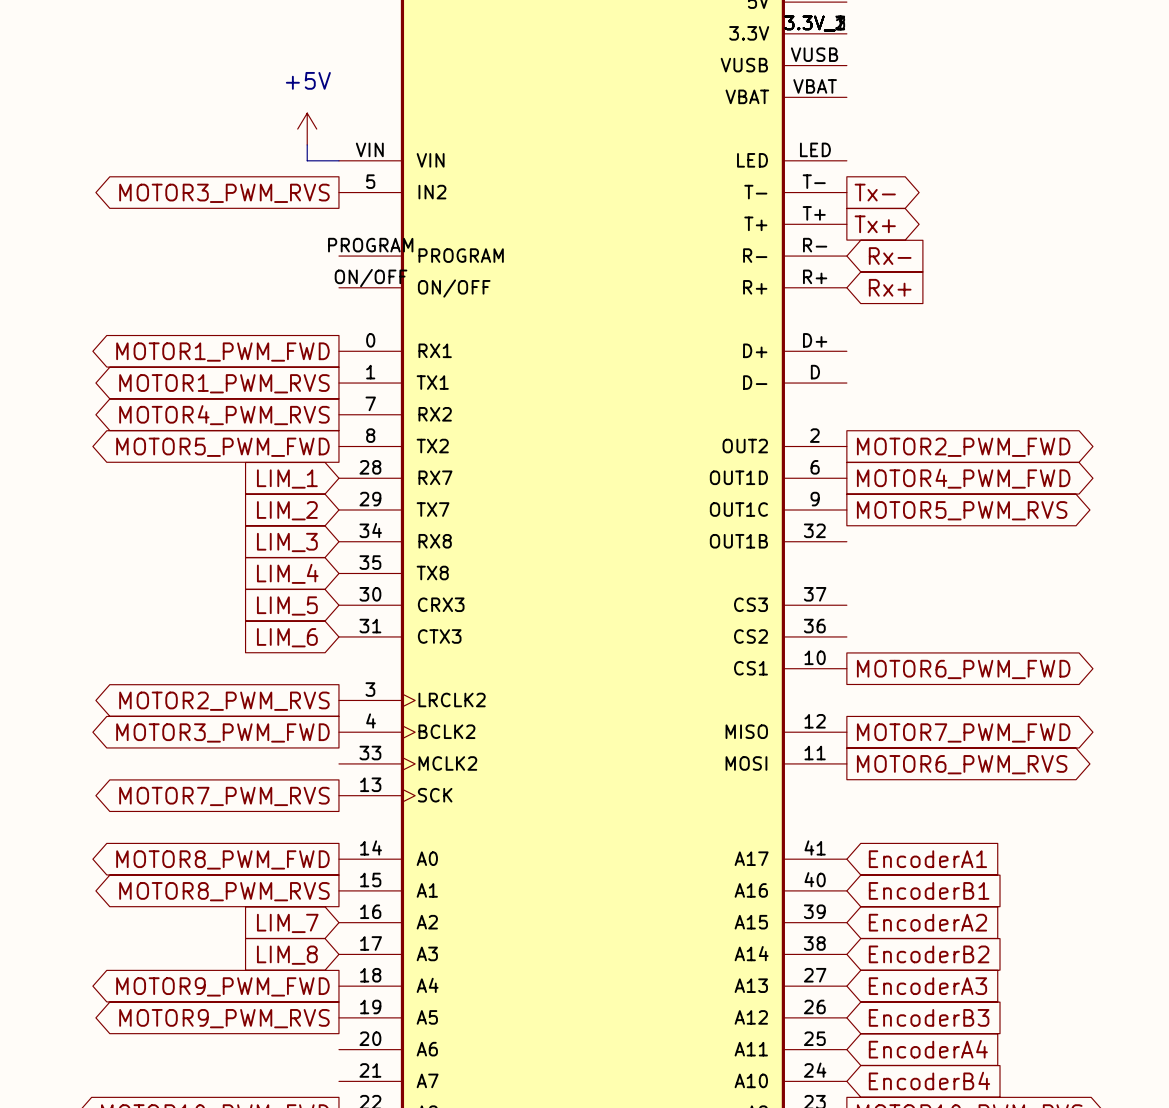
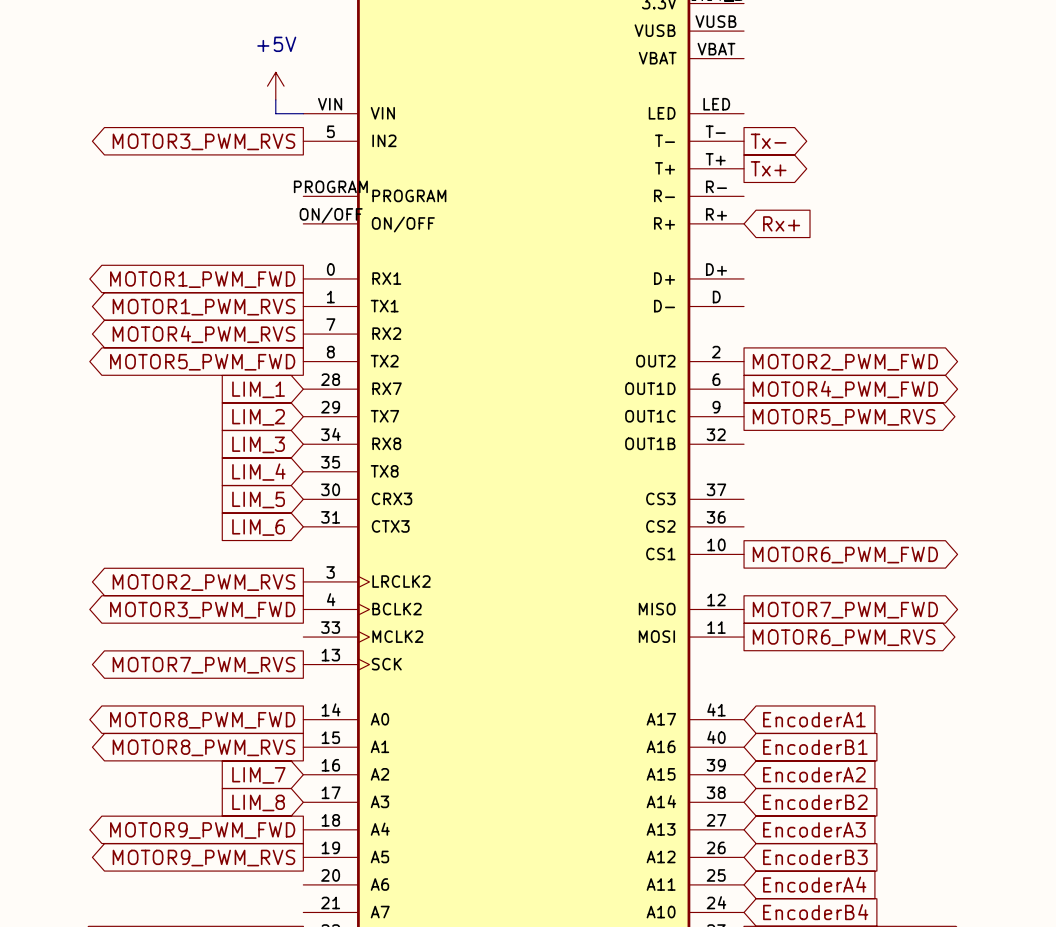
global label: Rx- (890, 256) -> none

